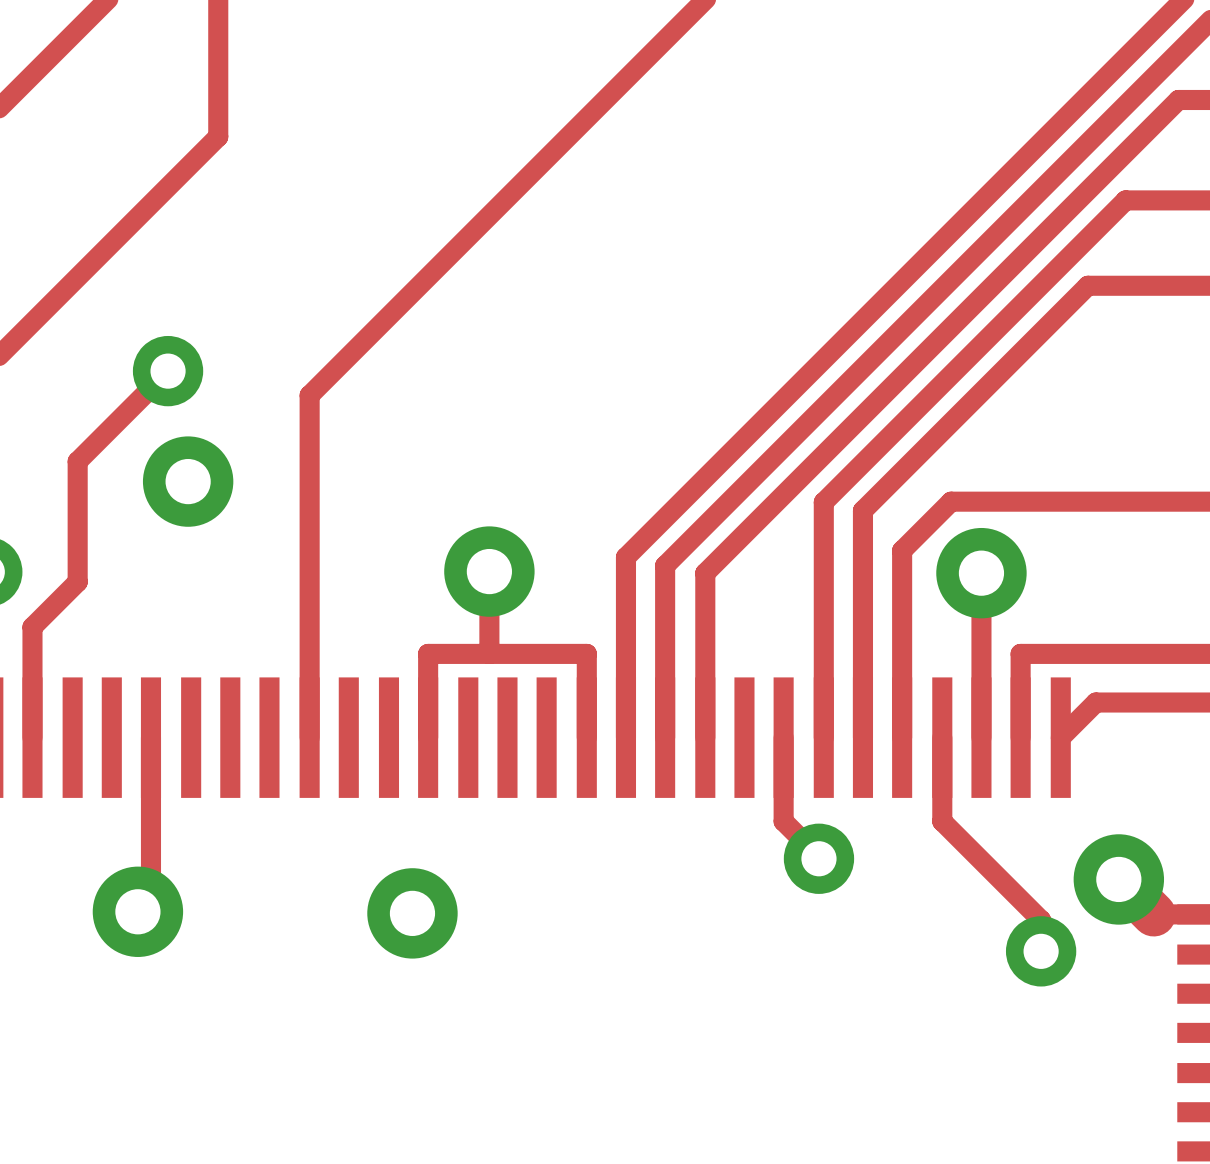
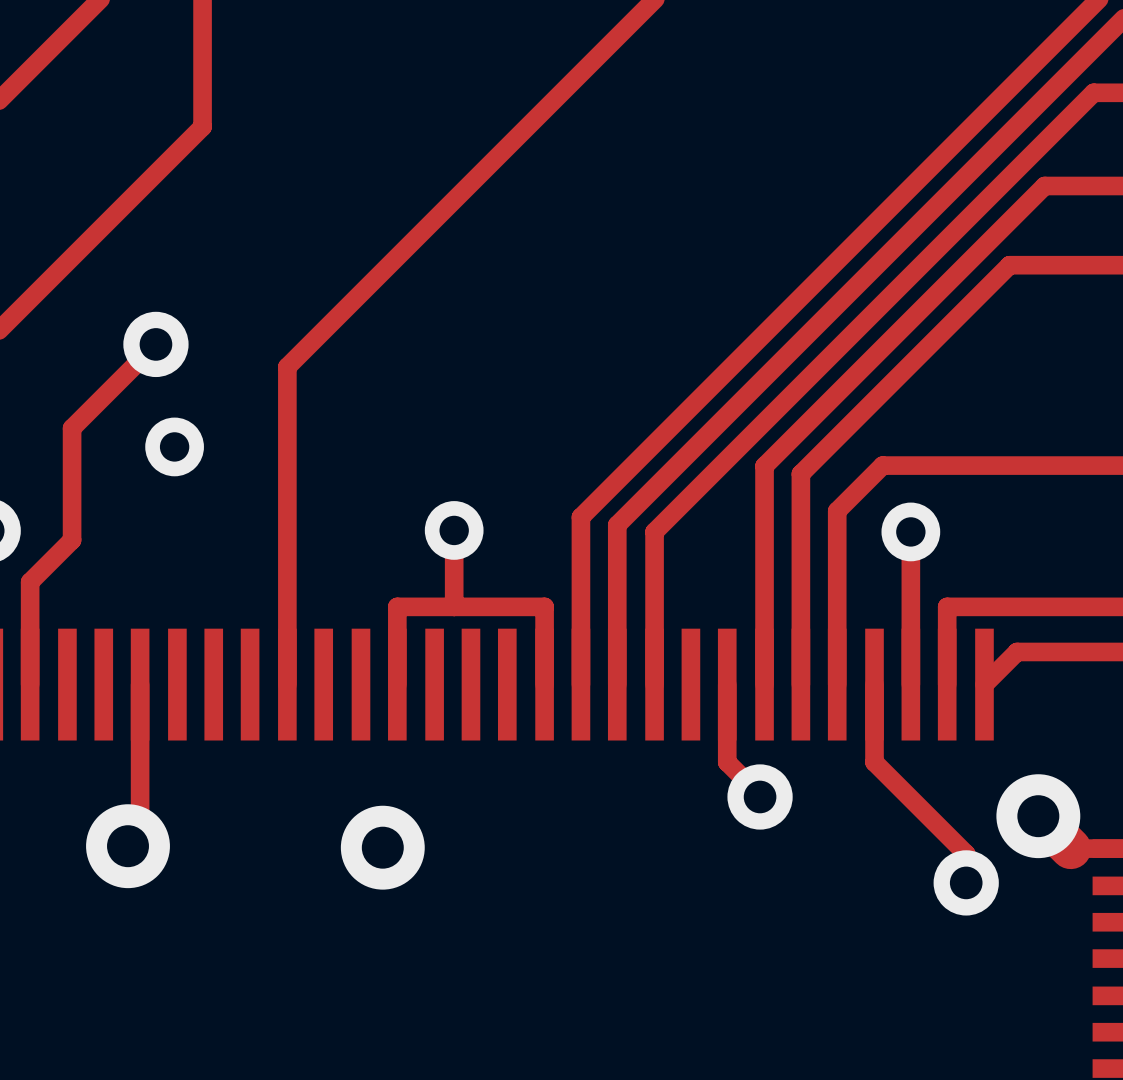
via size: [142, 436, 234, 527] -> [145, 417, 204, 477]
via size: [444, 526, 535, 617] -> [424, 501, 484, 560]
via size: [936, 527, 1027, 619] -> [881, 502, 941, 562]

